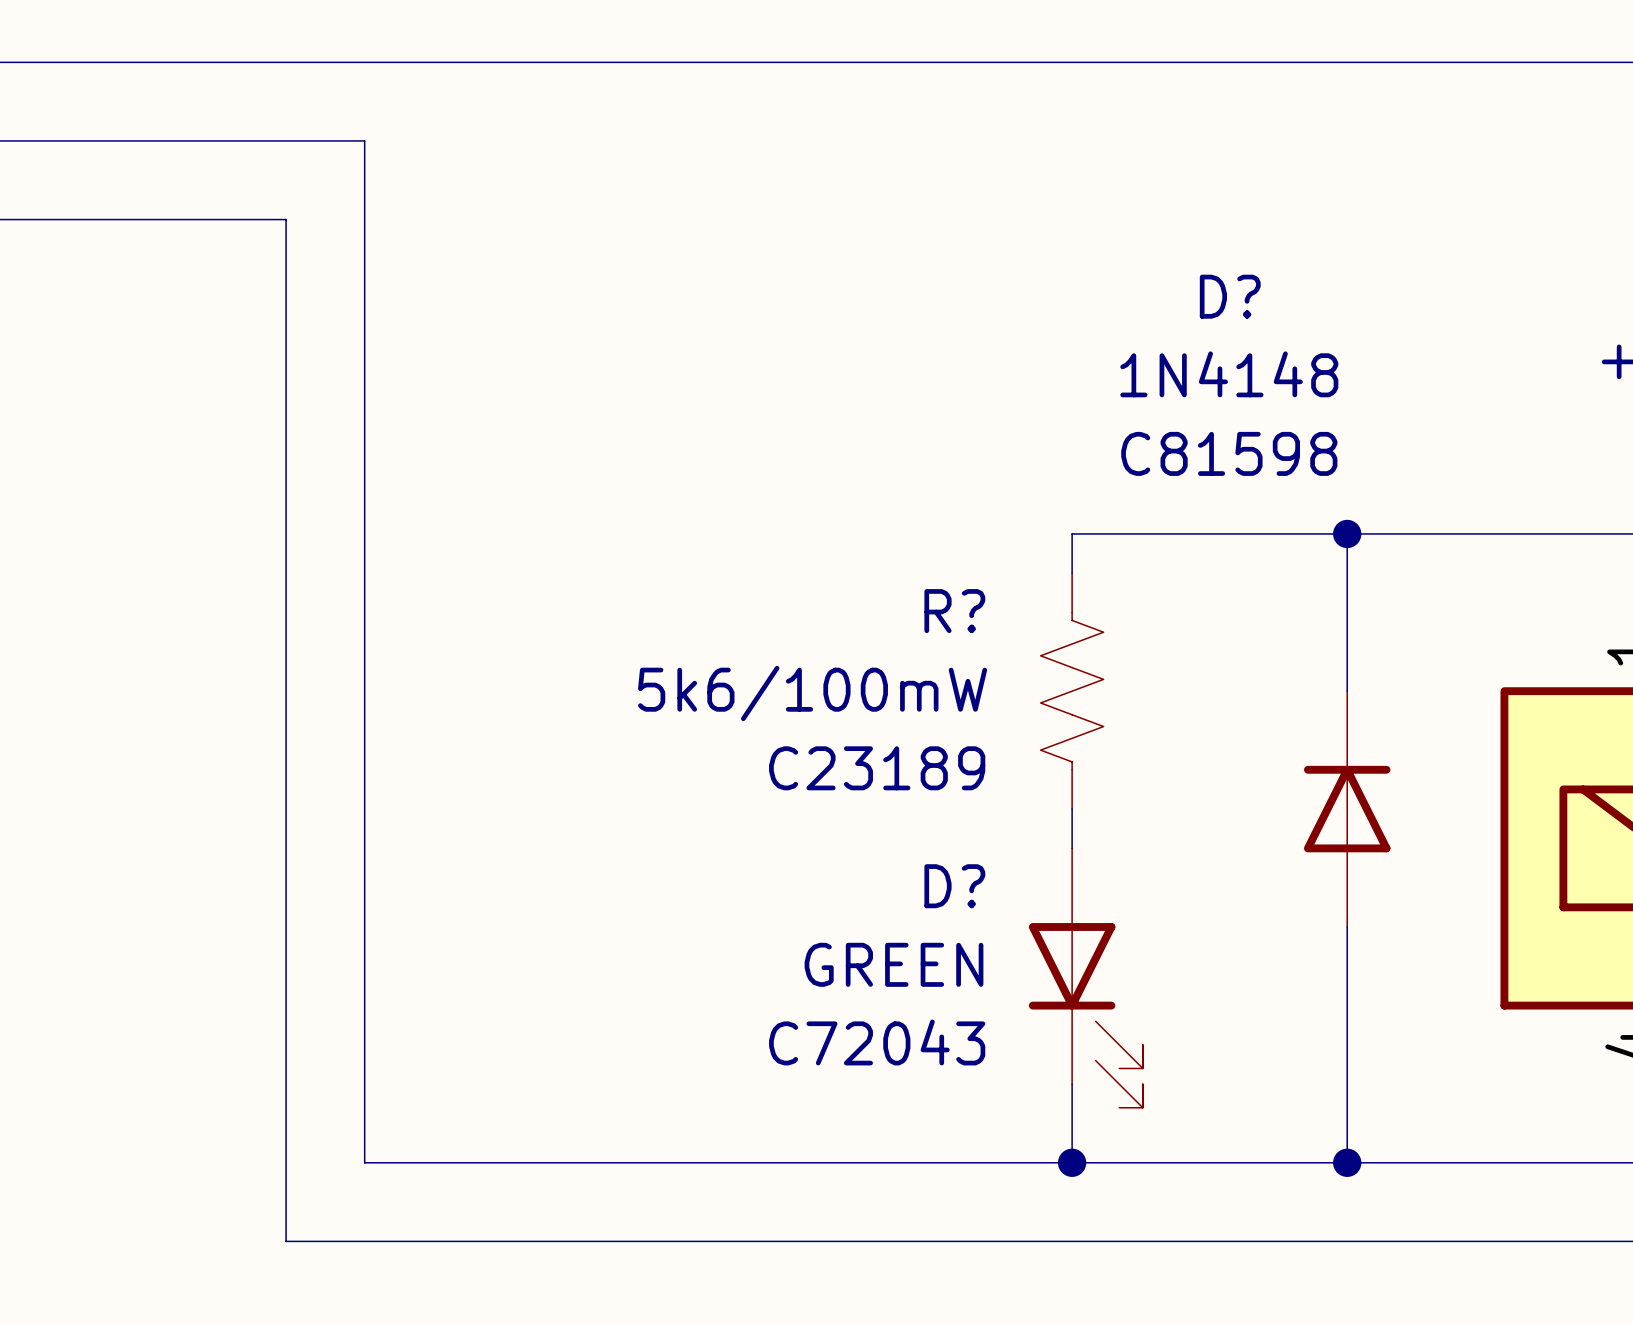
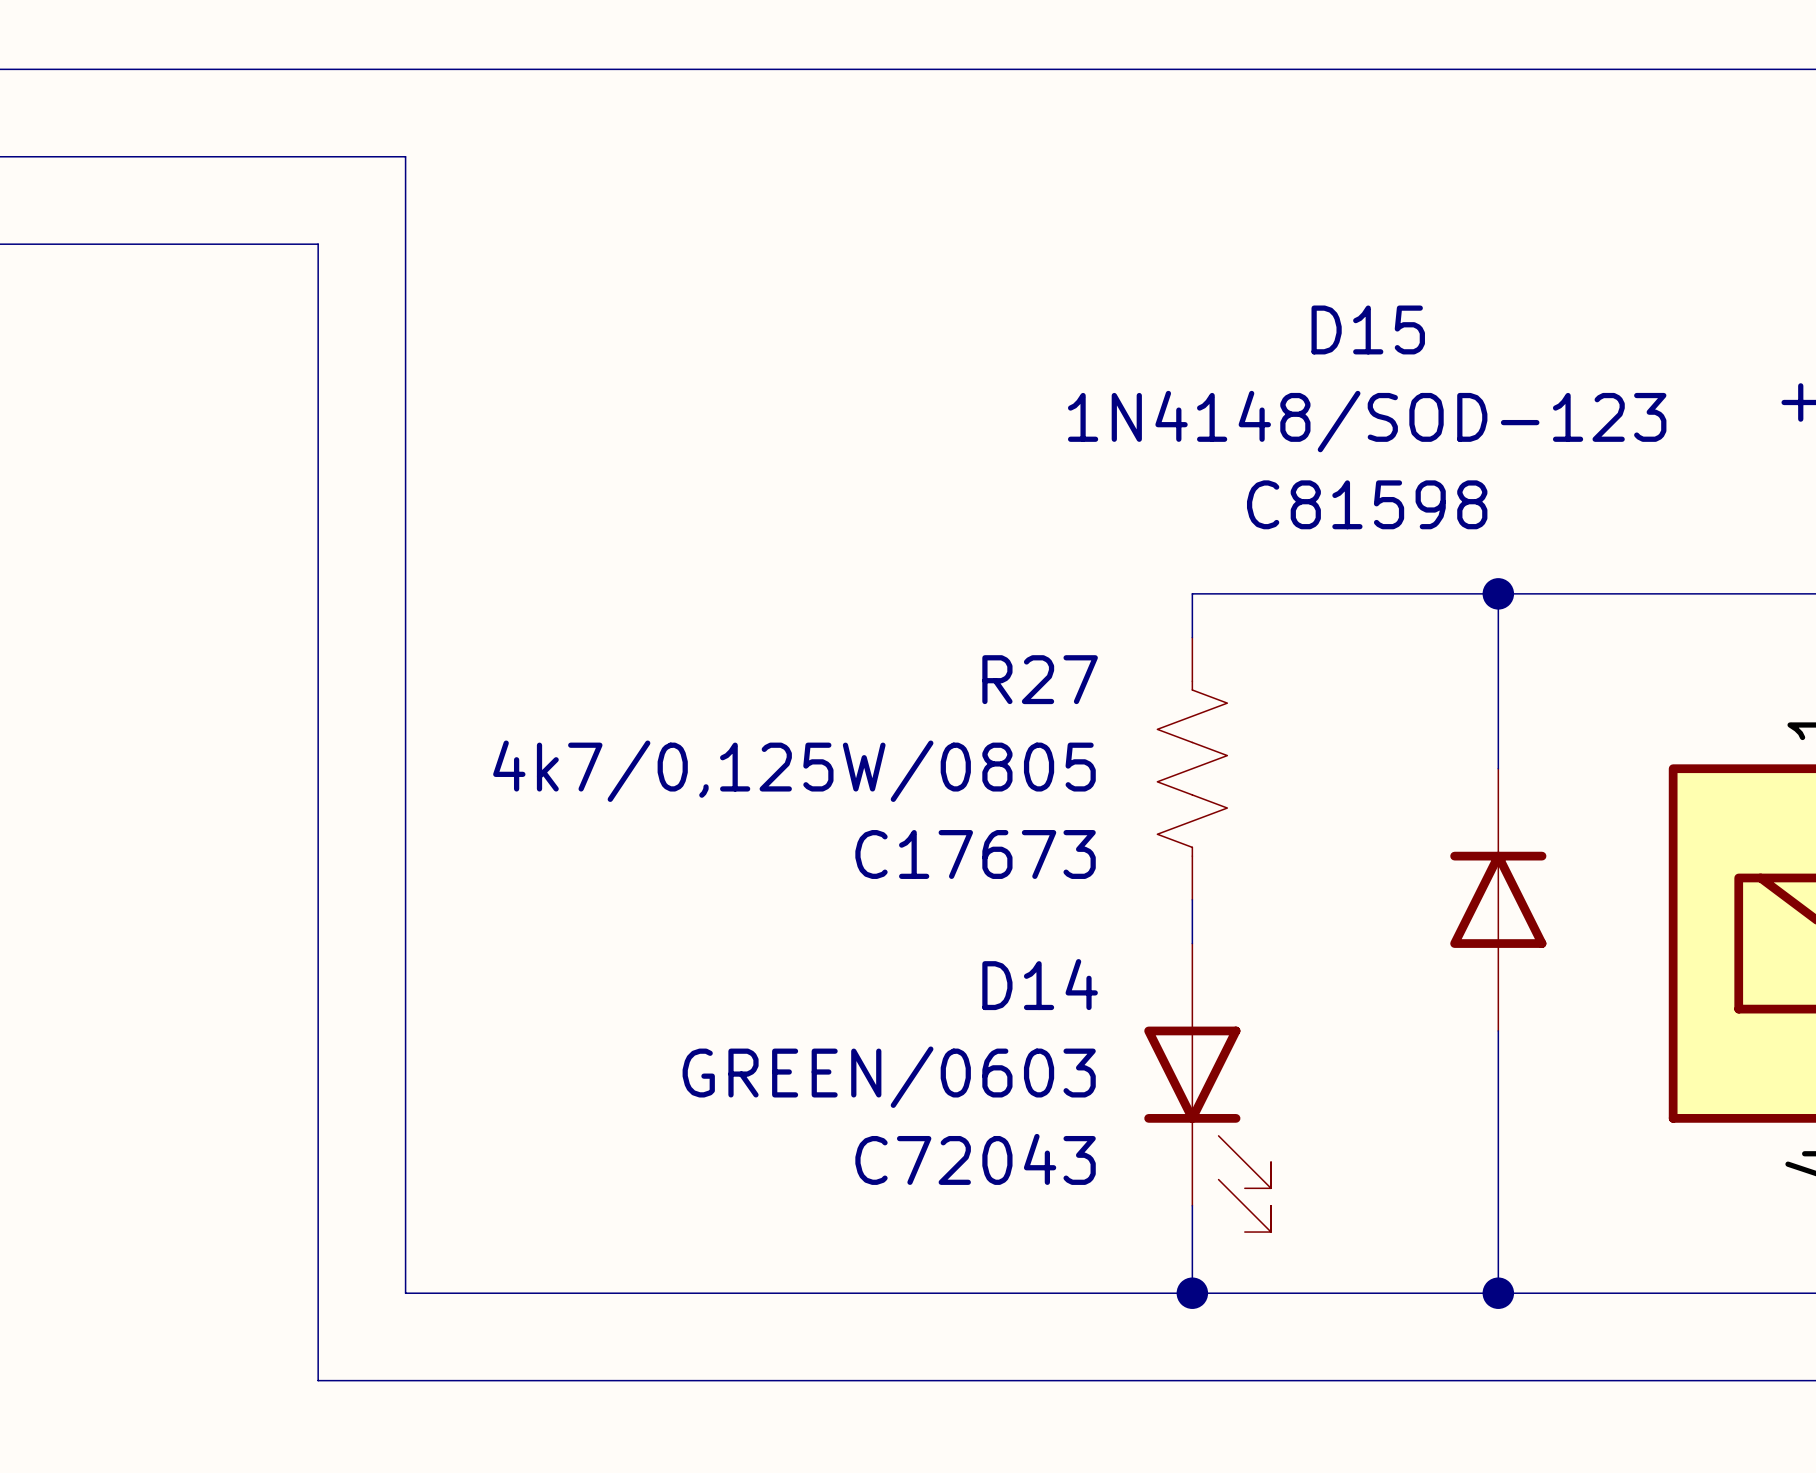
D? name: D? (1230, 296) -> D15 (1368, 329)
D? value: 1N4148 (1229, 374) -> 1N4148/SOD-123 (1367, 421)
R? name: R? (954, 611) -> R27 (1040, 679)
R? value: 5k6/100mW (812, 693) -> 4k7/0,125W/0805 (794, 771)
R? text: C23189 (877, 768) -> C17673 (975, 854)
D? name: D? (954, 886) -> D14 (1040, 984)
D? value: GREEN (894, 964) -> GREEN/0603 (889, 1077)

